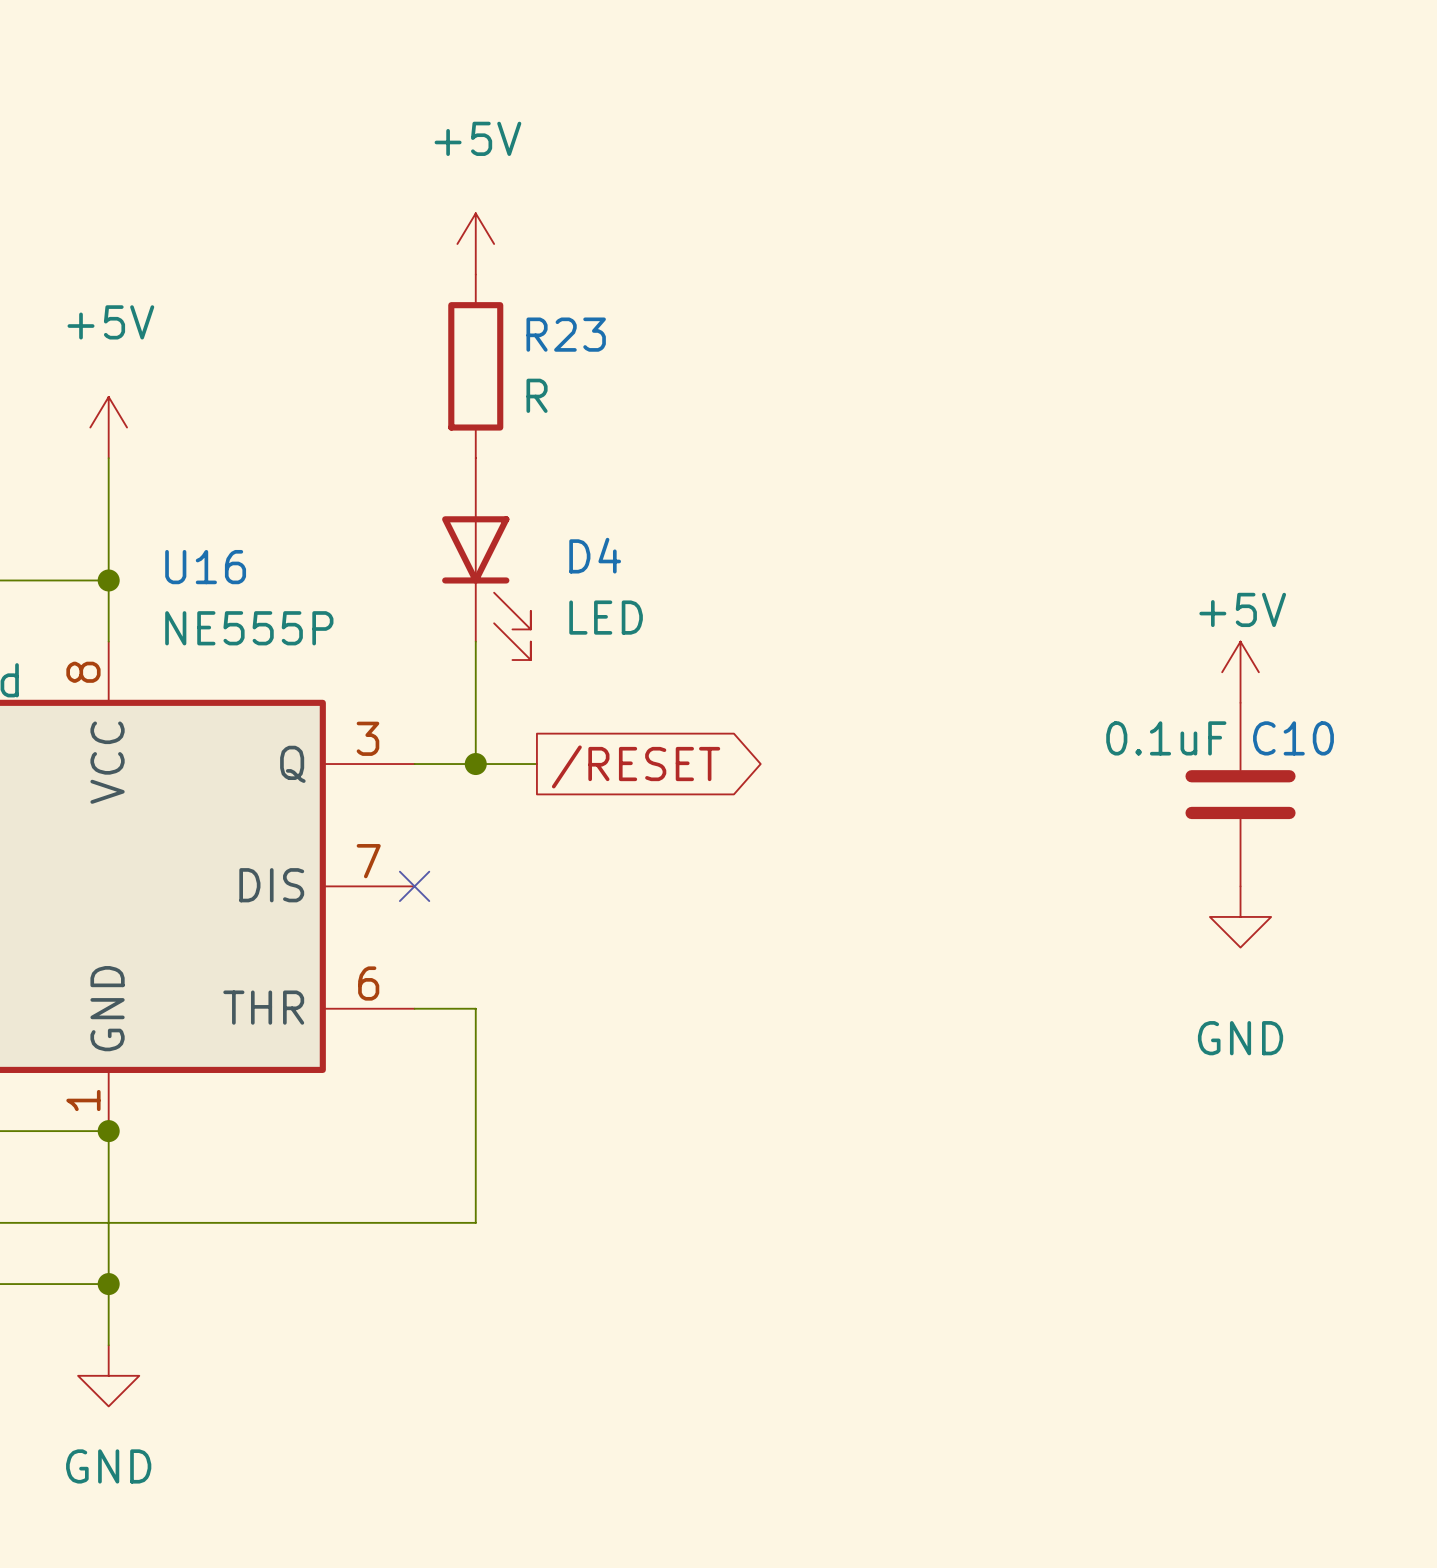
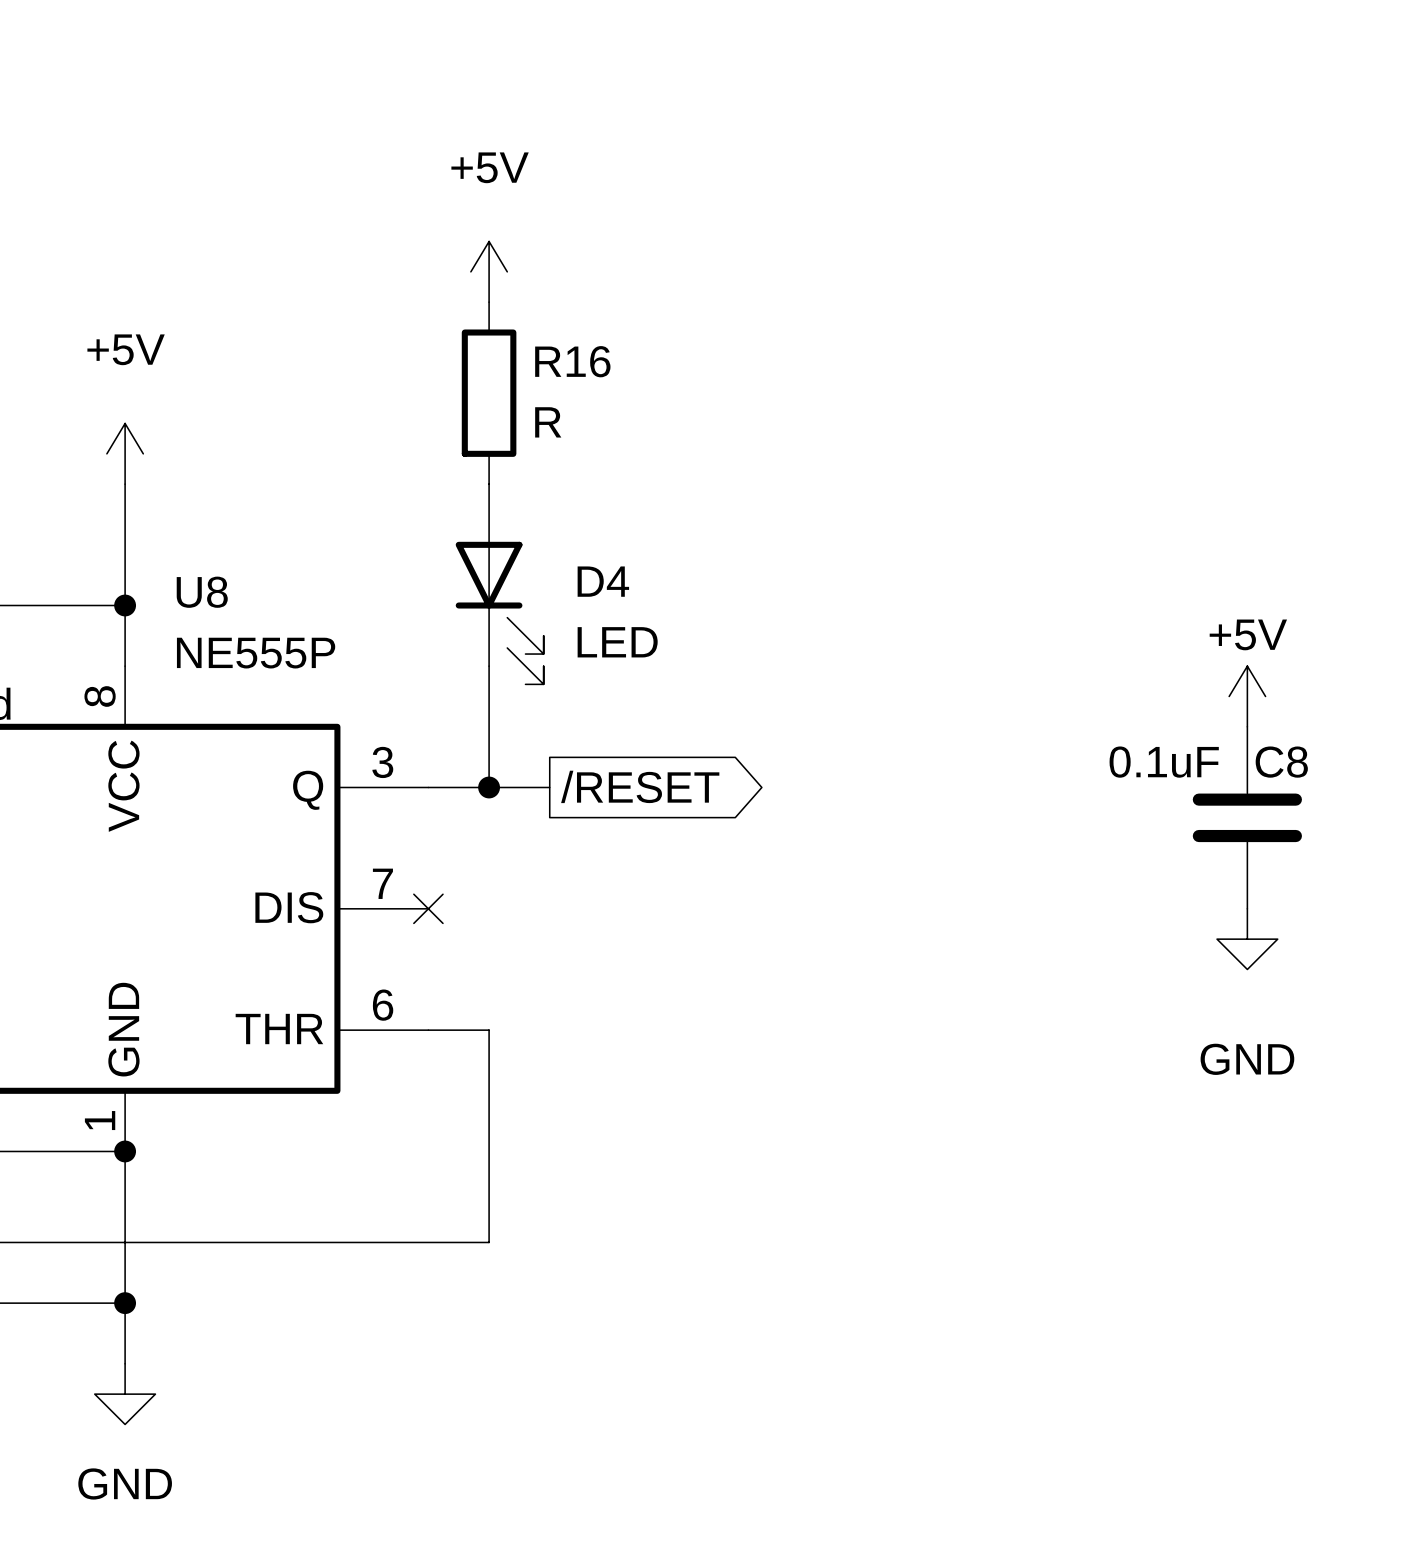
R23 name: R23 (566, 334) -> R16 (572, 361)
U16 name: U16 (205, 567) -> U8 (202, 592)
C10 name: C10 (1293, 738) -> C8 (1281, 762)

